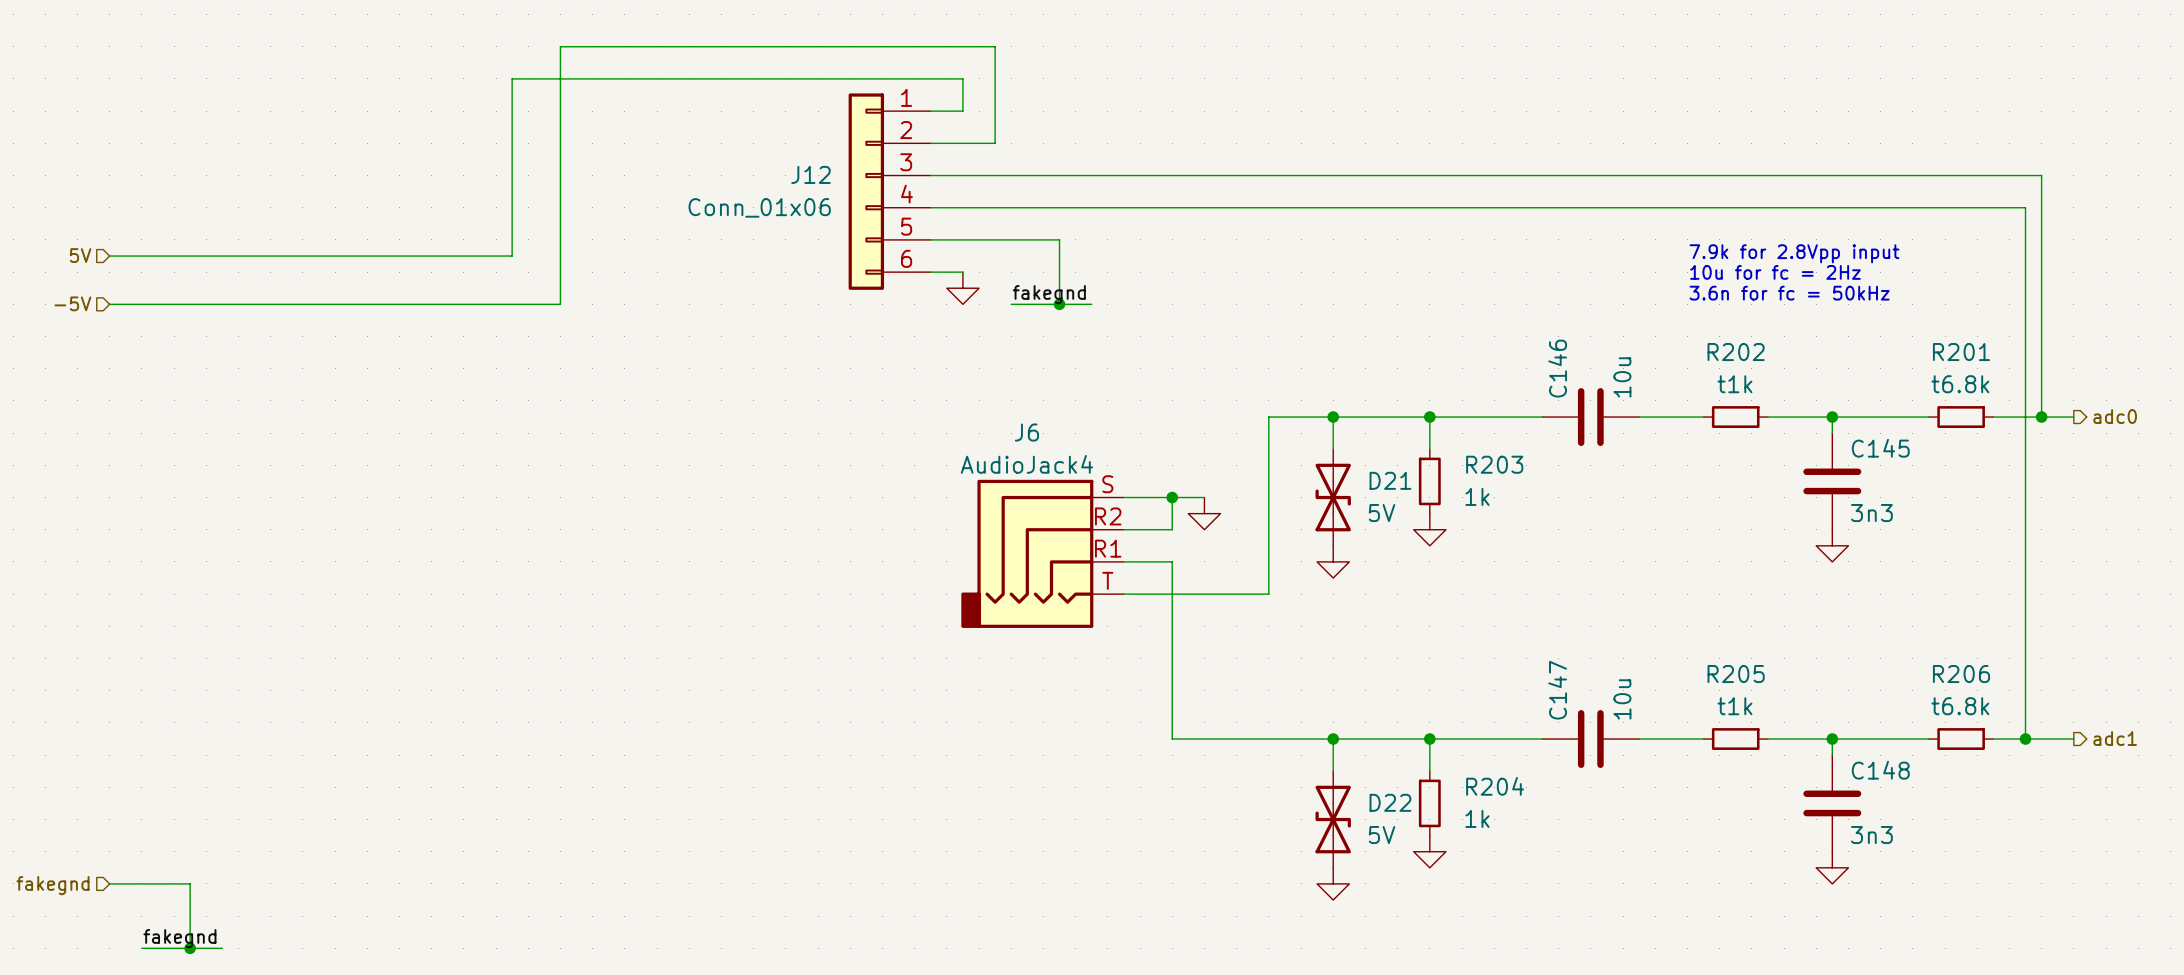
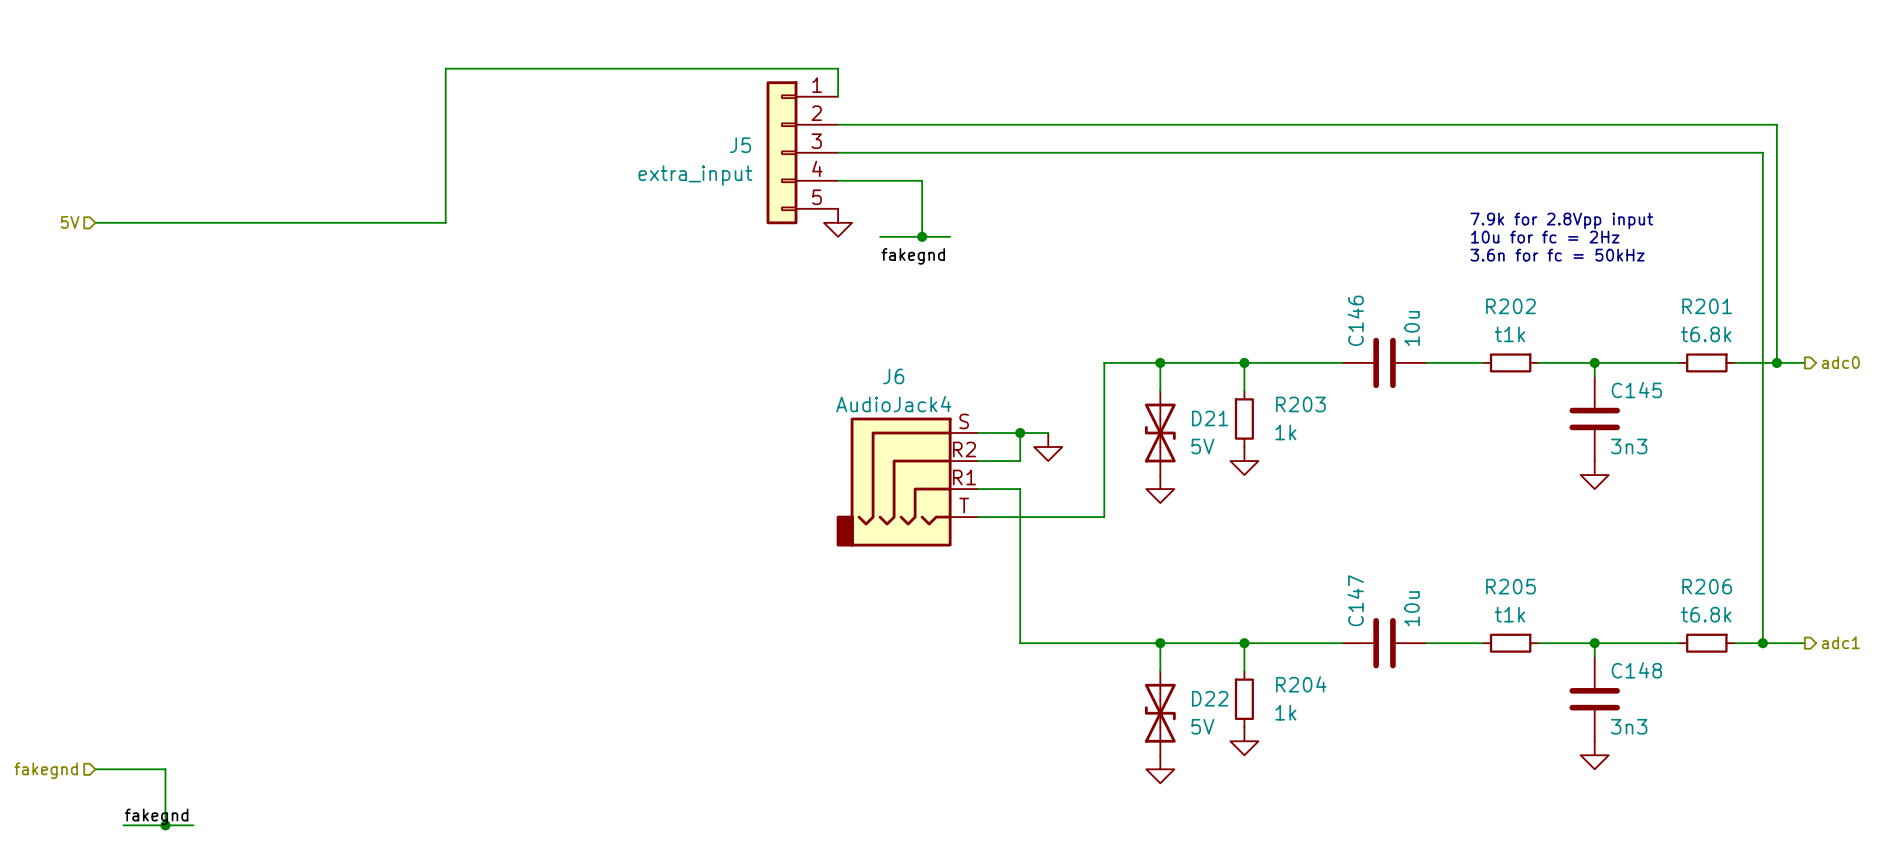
wire: (995, 143) (995, 46) (560, 46) (560, 304) (109, 304) -> (866, 124) (1776, 124) (1776, 152)
J5: none -> extra_input (802, 152)
wire: (2025, 175) (2041, 175) -> (1762, 152) (1762, 180)
J12: Conn_01x06 (889, 191) -> none
wire: (1059, 207) (2025, 207) -> none
wire: (930, 239) (1059, 239) -> (922, 180) (922, 208)
wire: (930, 272) (962, 272) -> none
wire: (1059, 272) (1059, 304) -> none
power symbol position: (962, 288) -> (838, 222)
hierarchical label: -5V (72, 303) -> none
wire: (1011, 304) (1091, 304) -> (880, 236) (950, 236)
junction position: (1059, 304) -> (922, 236)

